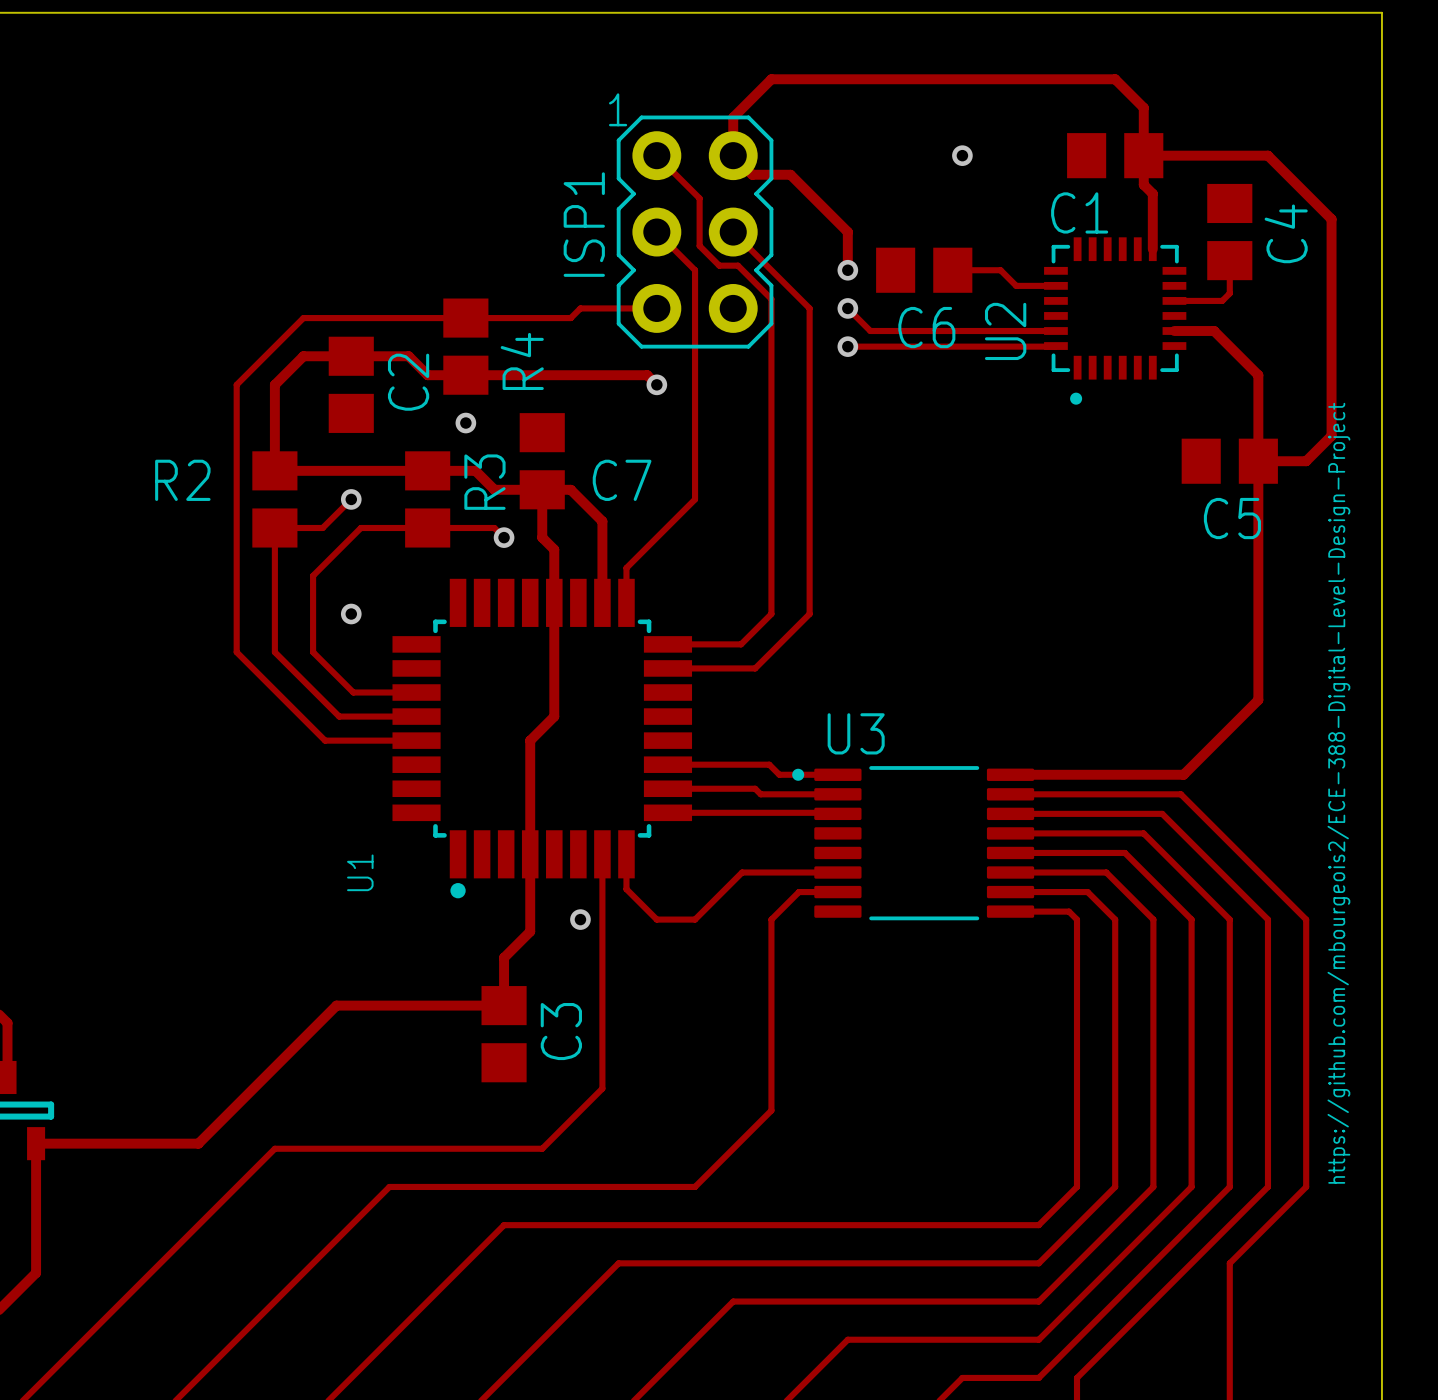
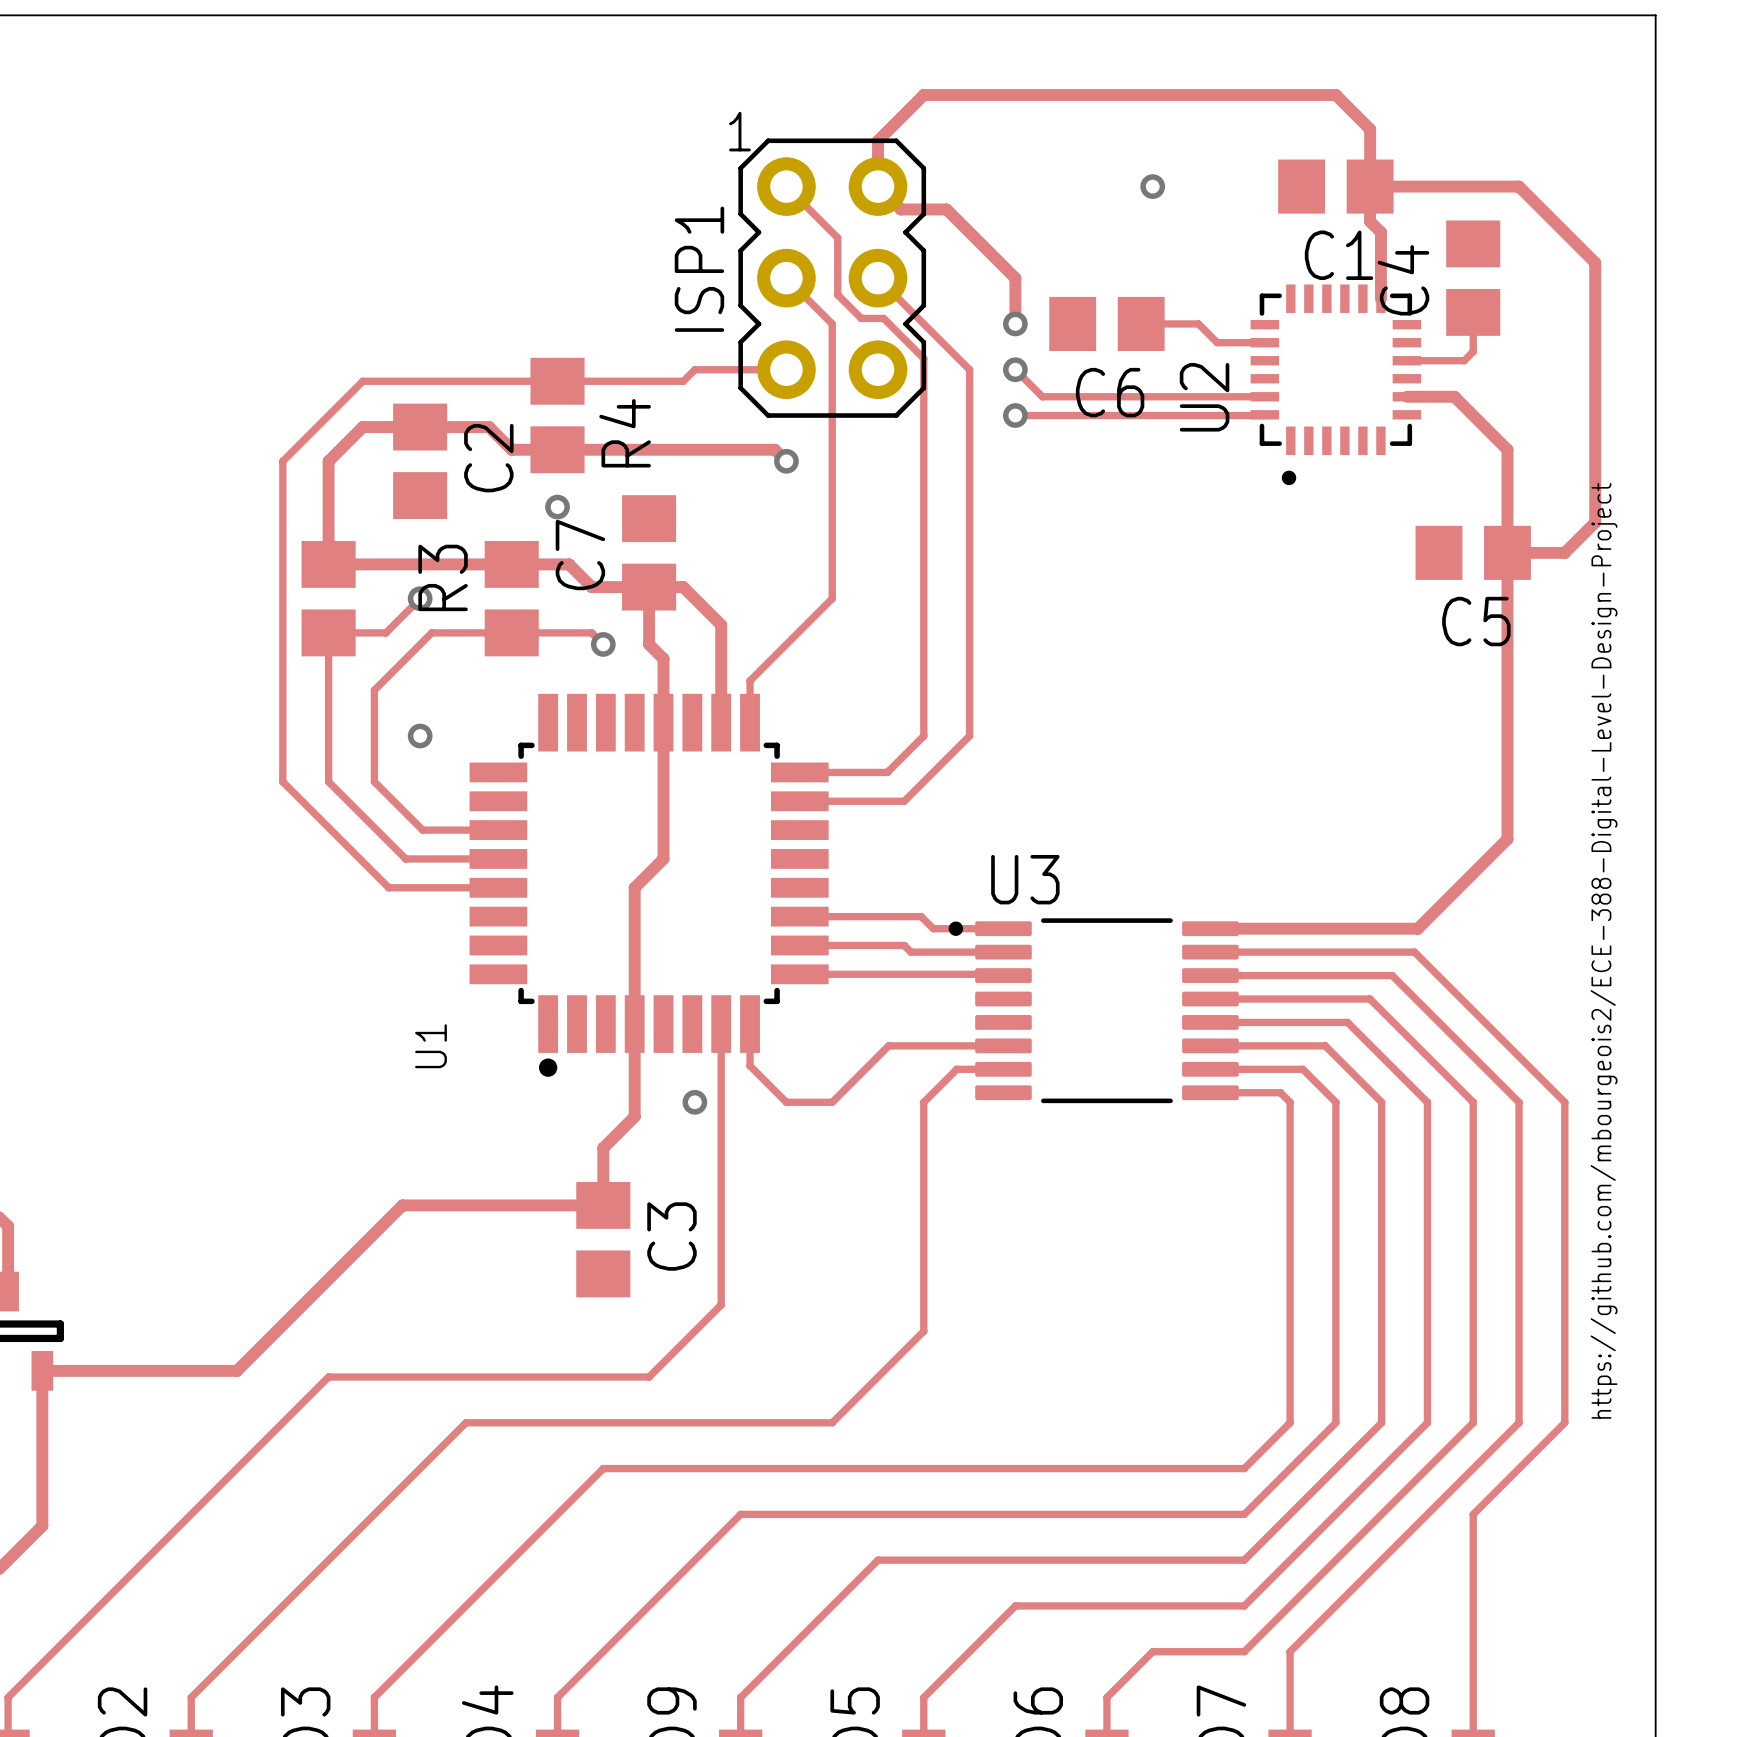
C1 name position: C1 (1079, 212) -> C1 (1339, 255)
C4 name position: C4 (1286, 233) -> C4 (1403, 280)
R2 name: R2 (182, 480) -> none
C7 name rotation: 0° (622, 480) -> 90° counterclockwise (580, 555)
C7 name position: C7 (622, 480) -> C7 (580, 555)
R3 name position: R3 (484, 482) -> R3 (443, 577)

